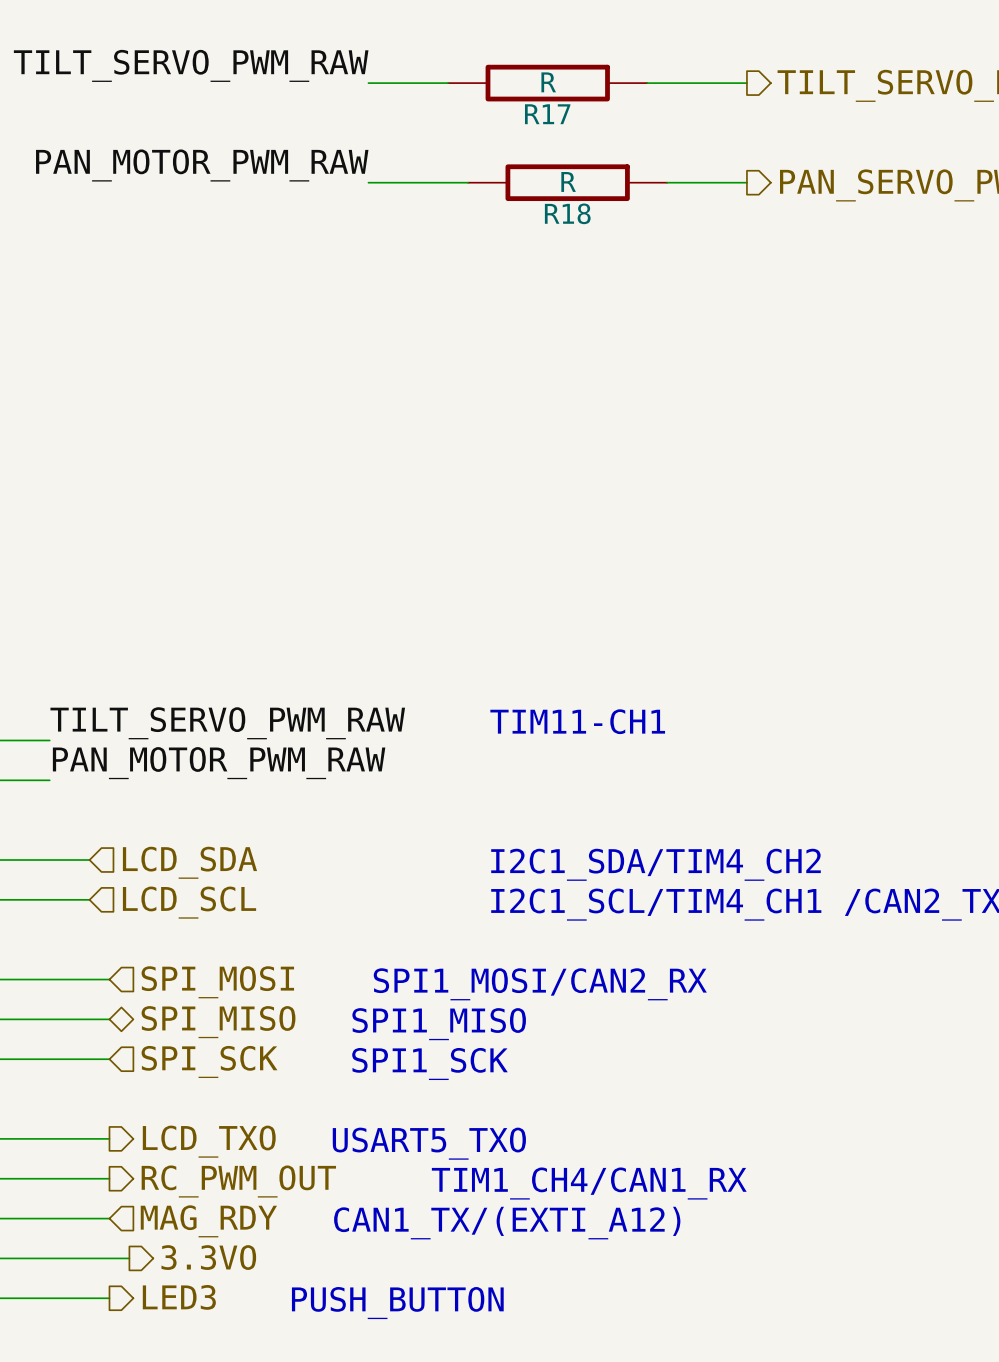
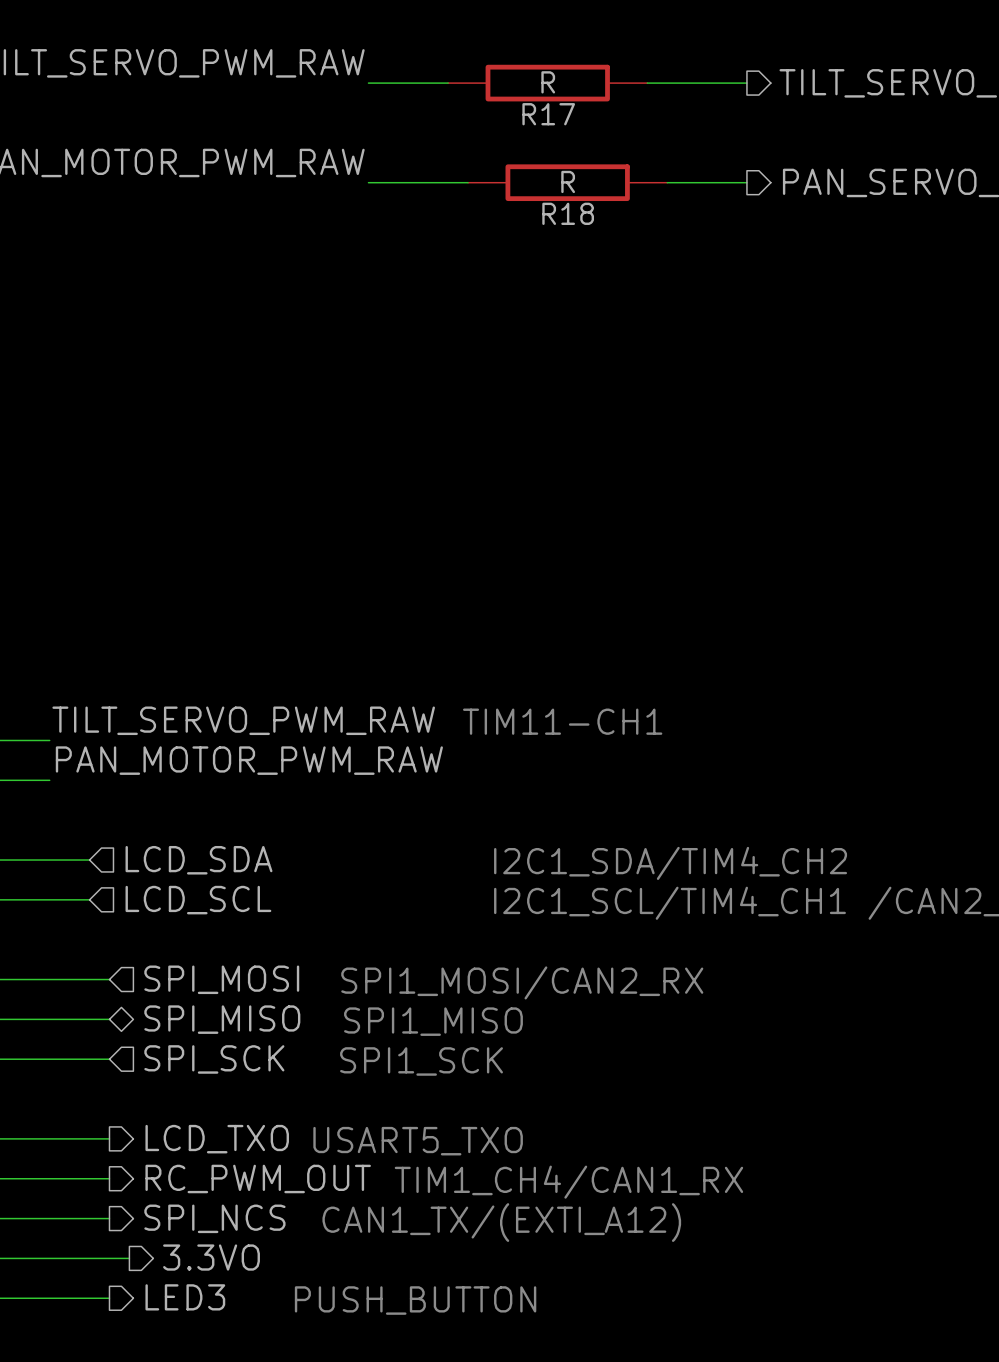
hierarchical label shape: input (208, 1221) -> output (214, 1218)
hierarchical label: MAG_RDY (208, 1221) -> SPI_NCS (214, 1218)

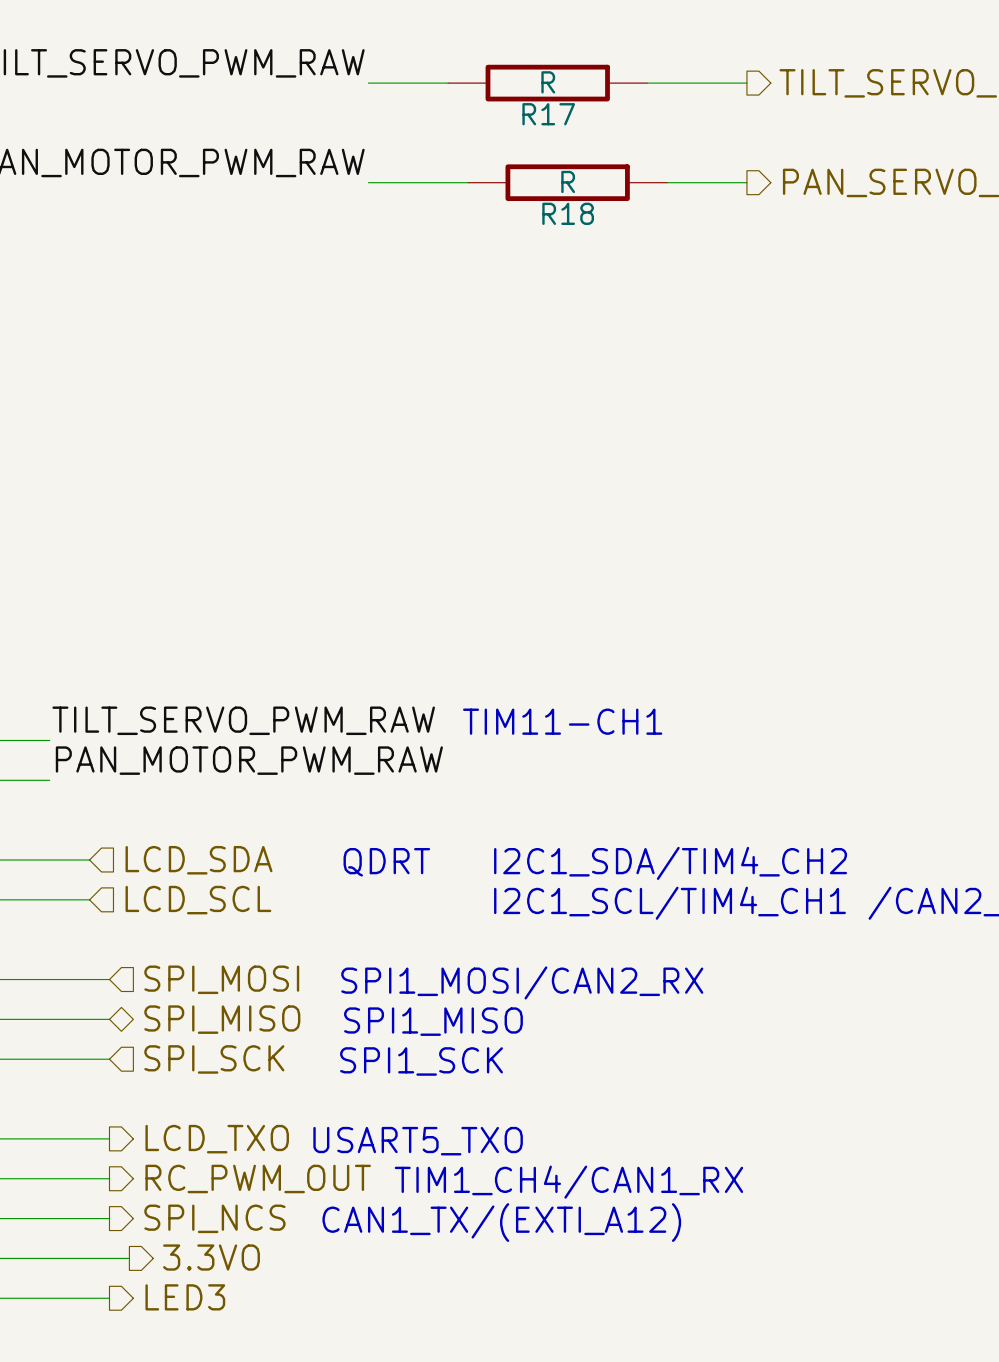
text: none -> QDRT (386, 862)
text: PUSH_BUTTON (415, 1300) -> none

